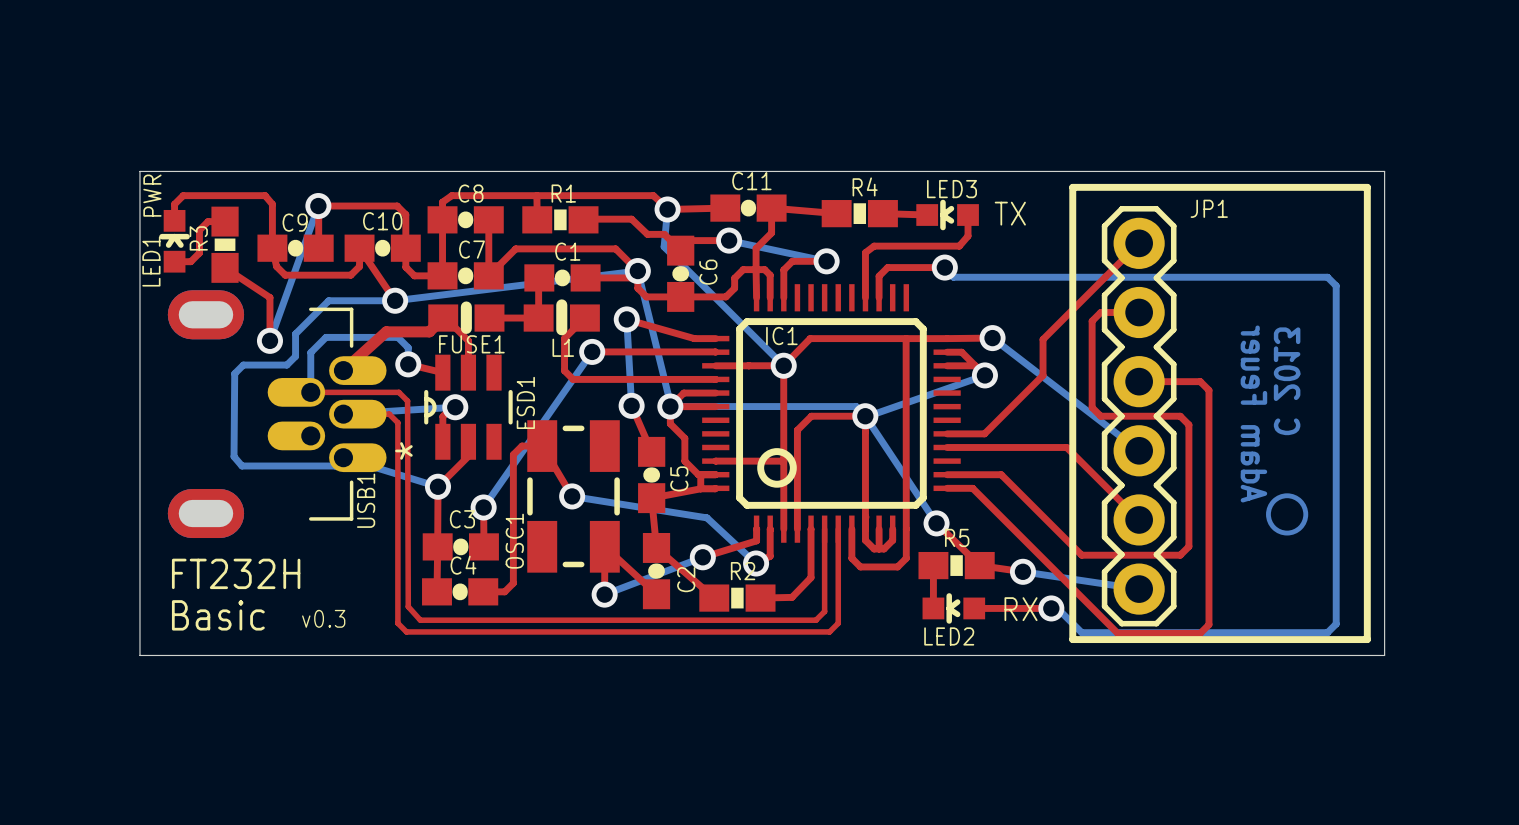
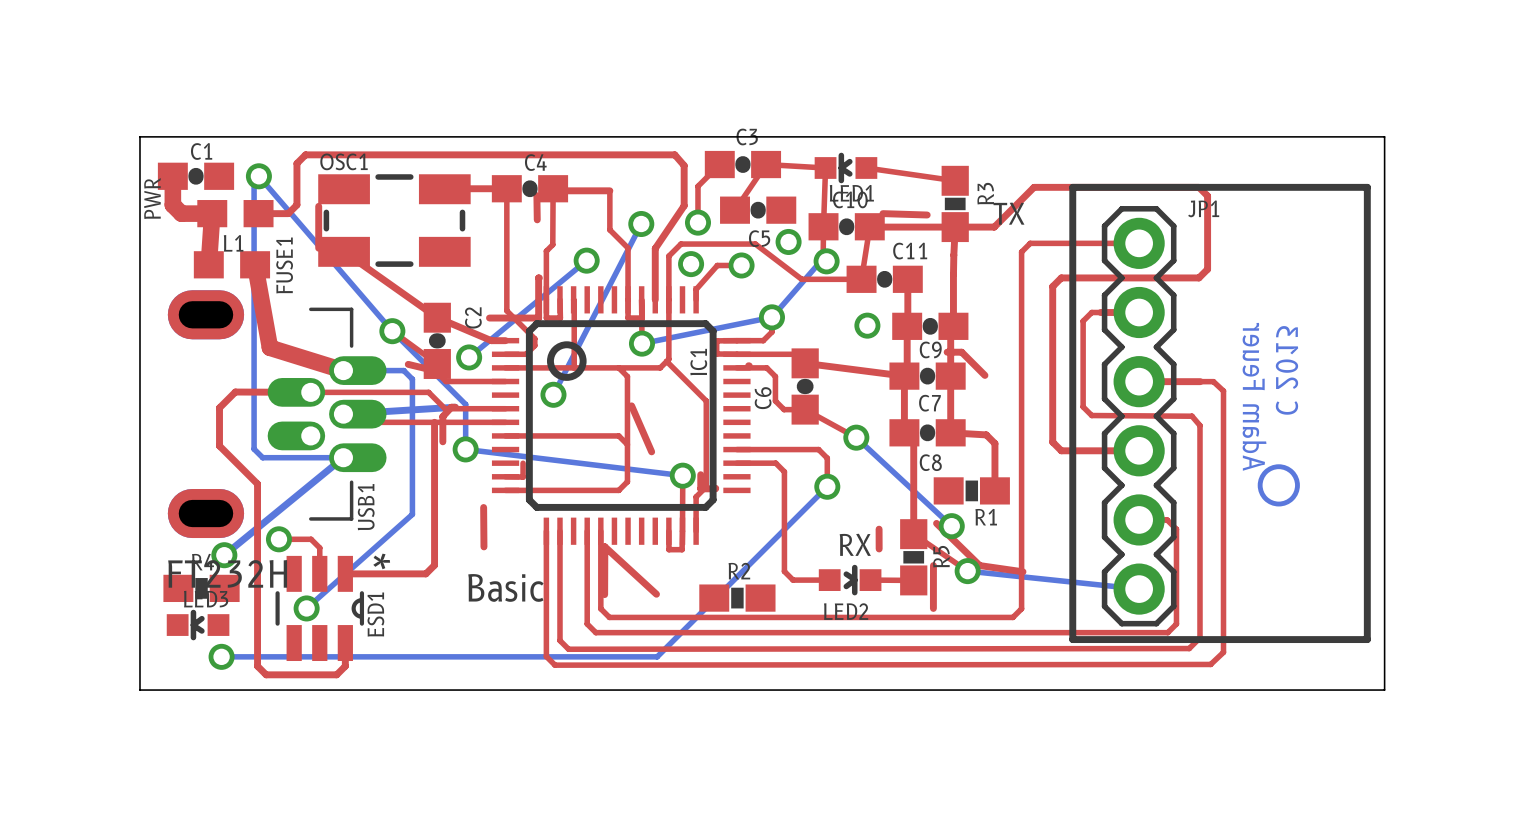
top track: none -> (719, 164) (697, 186) (697, 222)
top track: none -> (866, 167) (955, 180)
board edge: (139, 171) (1384, 171) -> (139, 171) (139, 136) (1384, 136) (1384, 171)
top track: none -> (172, 176) (172, 204) (181, 213) (212, 213) (208, 264)
C11 name position: C11 (751, 181) -> C11 (910, 251)
top track: none -> (444, 189) (506, 188) (506, 310) (534, 338) (534, 345) (526, 354) (505, 354)
C8 name position: C8 (470, 193) -> C8 (930, 462)
R1 name position: R1 (563, 193) -> R1 (986, 517)
top track: (318, 206) (397, 206) (405, 214) (405, 267) (414, 275) (442, 275) (442, 202) (451, 195) (653, 195) (667, 209) (725, 208) -> none
bottom track: (318, 206) (269, 340) -> none
via position: (318, 206) -> (258, 176)
C11 position: (748, 208) -> (884, 279)
bottom track: (667, 209) (664, 246) (783, 365) -> none
via: (667, 209) -> none
top track: none -> (735, 210) (766, 164) (825, 167) (823, 258)
top track: (836, 213) (771, 208) (771, 233) (756, 248) (756, 297) -> none
R4 position: (859, 213) -> (201, 588)
top track: none -> (259, 214) (288, 213) (296, 204) (296, 163) (305, 154) (674, 154) (684, 165) (684, 205) (655, 248) (655, 299)
LED3 position: (947, 215) -> (198, 625)
top track: (968, 215) (968, 236) (959, 246) (874, 246) (865, 252) (865, 297) -> none
C8 position: (465, 219) -> (927, 432)
top track: (488, 219) (488, 275) (515, 248) (615, 248) (637, 271) -> none
R1 position: (560, 219) -> (971, 490)
top track: (583, 219) (631, 219) (647, 234) (664, 234) (680, 250) (689, 240) (729, 240) -> none
top track: (174, 220) (174, 204) (183, 195) (265, 195) (272, 204) (272, 248) (276, 266) (285, 275) (350, 275) (359, 266) (359, 248) (395, 300) -> none
top track: (225, 221) (208, 221) (199, 230) (199, 253) (190, 261) (174, 261) -> none
C9 name position: C9 (295, 222) -> C9 (930, 349)
via: none -> (697, 222)
bottom track: none -> (641, 224) (553, 394)
via: none -> (641, 224)
top track: none -> (869, 226) (861, 279) (801, 279) (755, 244) (680, 244) (668, 256) (668, 359) (660, 367) (505, 367)
top track: none -> (870, 227) (994, 227) (1034, 187) (1198, 187) (1207, 195) (1207, 269) (1198, 277) (1061, 277) (1052, 286) (1052, 442) (1061, 450) (1139, 450)
top track: none -> (955, 227) (953, 326) (950, 338) (950, 432) (986, 434) (994, 443) (994, 490)
R3 name position: R3 (198, 238) -> R3 (985, 193)
bottom track: (729, 240) (826, 261) -> none
via: (729, 240) -> none
LED1 rotation: 0° (174, 241) -> 90° counterclockwise (845, 167)
LED1 position: (174, 241) -> (845, 167)
via: none -> (788, 241)
top track: (1139, 243) (1043, 339) (1043, 375) (984, 433) (947, 433) -> (1139, 243) (1030, 243) (1021, 252) (1021, 608) (1012, 617) (609, 617) (600, 608) (600, 531)
R3 position: (225, 244) -> (955, 203)
C9 position: (295, 248) -> (930, 326)
C10 position: (382, 248) -> (846, 226)
C7 name position: C7 (472, 249) -> C7 (929, 403)
top track: none -> (344, 251) (437, 317) (491, 340) (505, 340)
C1 name position: C1 (567, 251) -> C1 (201, 151)
bottom track: none -> (823, 258) (771, 317) (641, 343)
bottom track: none -> (586, 260) (469, 357)
via: none -> (586, 260)
top track: (826, 261) (792, 261) (783, 269) (783, 297) -> none
via: none -> (691, 264)
top track: none -> (741, 265) (717, 265) (696, 289) (696, 299)
via: none -> (741, 265)
top track: (225, 267) (269, 297) (269, 340) -> none
top track: (944, 267) (887, 267) (879, 276) (879, 297) -> none
bottom track: (944, 267) (953, 277) (1327, 277) (1336, 285) (1336, 624) (1327, 632) (1081, 632) (1057, 608) (1051, 608) -> none
via: (944, 267) -> none
top track: (637, 271) (637, 288) (646, 296) (726, 296) (734, 288) (734, 278) (743, 269) (764, 269) (770, 275) (770, 297) -> none
top track: (637, 271) (630, 277) (585, 277) -> none
via: (637, 271) -> none
C6 name position: C6 (708, 272) -> C6 (763, 398)
C6 position: (680, 273) -> (805, 386)
C7 position: (465, 275) -> (927, 376)
C1 position: (562, 277) -> (195, 176)
top track: none -> (907, 279) (907, 373) (904, 376)
top track: none -> (559, 299) (560, 318) (546, 318) (546, 251) (552, 244) (553, 188) (555, 190) (609, 190) (609, 229) (628, 248) (628, 318) (641, 318) (641, 299) (641, 343)
top track: none -> (573, 299) (574, 367)
via: (395, 300) -> none
line: (561, 304) (561, 329) -> none
line: (466, 306) (466, 328) -> none
top track: (1100, 312) (1092, 321) (1092, 407) (1100, 416) (1180, 416) (1188, 424) (1188, 546) (1180, 555) (1081, 555) (1001, 474) (947, 474) -> (1100, 312) (1091, 312) (1083, 321) (1083, 406) (1091, 415) (1192, 416) (1199, 425) (1199, 637) (1189, 648) (568, 649) (559, 640) (559, 531)
top track: none -> (771, 317) (771, 332) (763, 340) (716, 340) (716, 353) (796, 354) (805, 362)
via: none -> (771, 317)
FUSE1 position: (466, 318) -> (231, 264)
L1 position: (561, 318) -> (235, 213)
top track: (584, 318) (564, 338) (564, 370) (573, 379) (715, 379) -> none
top track: (626, 319) (694, 338) (715, 338) -> none
bottom track: (626, 319) (631, 405) -> none
via: (626, 319) -> none
via: none -> (867, 325)
top track: none -> (392, 331) (437, 363) (437, 372) (445, 381) (505, 381)
via: none -> (392, 331)
top track: (906, 338) (906, 558) (897, 566) (860, 566) (851, 558) (851, 529) -> none
top track: (992, 338) (810, 338) (783, 365) -> none
bottom track: (992, 338) (1139, 450) -> none
via: (992, 338) -> none
via: (269, 340) -> none
via: none -> (641, 343)
FUSE1 name rotation: 0° (471, 344) -> 90° counterclockwise (284, 265)
top track: (592, 351) (715, 351) -> none
bottom track: (592, 351) (483, 507) -> none
via: (592, 351) -> none
via: none -> (469, 357)
top track: none -> (666, 361) (706, 401) (706, 486) (696, 496) (696, 531)
top track: none -> (805, 363) (904, 376)
bottom track: (408, 364) (408, 347) (397, 337) (325, 337) (310, 352) (310, 392) -> none
via: (408, 364) -> none
top track: (783, 365) (783, 529) -> none
via: (783, 365) -> none
top track: (947, 365) (975, 365) -> none
top track: none -> (618, 367) (627, 376) (627, 481) (618, 490) (505, 490)
top track: none -> (736, 367) (766, 367) (775, 376) (775, 400) (784, 409) (805, 409) (856, 437)
top track: (343, 370) (386, 331) (429, 331) (443, 318) (445, 318) (468, 340) (468, 372) -> (343, 370) (269, 347) (255, 264)
bottom track: none -> (343, 370) (403, 370) (412, 379) (412, 514) (306, 608)
via: (984, 375) -> none
top track: none -> (904, 376) (904, 432) (913, 441) (913, 534) (967, 571)
bottom track: (984, 377) (984, 375) (865, 416) -> none
top track: (1200, 381) (1208, 390) (1208, 624) (1200, 633) (1117, 633) (972, 488) (947, 488) -> (1200, 381) (1213, 381) (1223, 390) (1223, 652) (1210, 664) (555, 665) (546, 656) (546, 531)
top track: none -> (310, 392) (235, 392) (219, 407) (219, 445) (257, 483) (257, 666) (266, 674) (336, 674) (345, 666) (345, 643)
top track: (398, 392) (407, 401) (408, 606) (420, 620) (815, 620) (824, 611) (824, 529) -> (398, 392) (428, 392) (445, 408) (505, 408)
top track: (715, 393) (683, 393) (670, 406) -> none
via: none -> (553, 394)
via: (631, 405) -> none
top track: (670, 406) (715, 406) -> none
top track: (670, 406) (670, 423) (684, 438) (684, 461) (698, 474) (715, 474) -> none
via: (670, 406) -> none
via: (455, 407) -> none
ESD1 rotation: 0° (468, 407) -> 180° (319, 608)
ESD1 position: (468, 407) -> (319, 608)
IC1 rotation: 0° (831, 413) -> 90° clockwise (621, 415)
IC1 position: (831, 413) -> (621, 415)
top track: (343, 414) (389, 414) (397, 422) (397, 623) (406, 631) (829, 631) (838, 623) (838, 529) -> (343, 414) (351, 422) (505, 422)
bottom track: (865, 416) (856, 406) (670, 406) (637, 271) (395, 300) (328, 300) (295, 333) (295, 356) (286, 365) (243, 365) (234, 373) (234, 456) (241, 466) (335, 466) (343, 457) (438, 486) -> none
bottom track: (865, 416) (936, 523) -> none
via position: (865, 416) -> (856, 437)
top track: none -> (434, 422) (434, 565) (425, 573) (345, 573)
top track: none -> (505, 435) (618, 435) (627, 444)
bottom track: none -> (856, 437) (951, 526)
top track: (468, 441) (468, 456) (438, 486) (436, 591) -> none
top track: (947, 447) (1066, 447) (1139, 519) -> (587, 531) (587, 624) (595, 632) (1167, 632) (1176, 624) (1176, 529) (1167, 519) (1139, 519)
via: none -> (465, 449)
top track: none -> (736, 449) (818, 449) (827, 458) (827, 486)
top track: (715, 461) (783, 461) -> none
top track: none -> (523, 463) (523, 477) (505, 476)
top track: none -> (736, 463) (775, 463) (784, 471) (784, 571) (793, 580) (829, 580)
C5 rotation: 0° (651, 475) -> 90° clockwise (758, 210)
C5 position: (651, 475) -> (758, 210)
top track: none -> (682, 475) (682, 549) (668, 549) (668, 531)
bottom track: none -> (682, 475) (465, 449) (465, 404) (392, 331) (258, 176) (254, 181) (254, 449) (262, 457) (343, 457) (224, 555)
via: none -> (682, 475)
via: (438, 486) -> none
bottom track: none -> (827, 486) (657, 656) (221, 656)
via: none -> (827, 486)
top track: (700, 488) (651, 498) (656, 547) (714, 598) -> none
top track: (572, 496) (542, 446) (522, 446) (513, 454) (513, 583) (504, 591) (483, 591) -> none
bottom track: (572, 496) (706, 517) (756, 563) -> none
via: (572, 496) -> none
OSC1 rotation: 0° (573, 496) -> 90° clockwise (394, 220)
OSC1 position: (573, 496) -> (394, 220)
via: (483, 507) -> none
drawing position: (1287, 514) -> (1278, 485)
via position: (936, 523) -> (951, 526)
top track: (756, 529) (756, 540) (702, 557) -> none
top track: (770, 529) (770, 556) (756, 563) -> none
top track: (797, 529) (797, 430) (811, 416) (865, 416) (865, 540) (874, 548) (884, 548) (892, 540) (892, 529) -> none
top track: (811, 529) (811, 577) (792, 597) (760, 598) -> none
top track: none -> (278, 539) (311, 539) (319, 547) (319, 573)
via: none -> (278, 539)
C3 position: (460, 546) -> (742, 164)
via: none -> (224, 555)
bottom track: (702, 557) (604, 594) -> none
via: (702, 557) -> none
via: (756, 563) -> none
R5 rotation: 0° (956, 565) -> 90° clockwise (913, 557)
C2 position: (656, 571) -> (437, 340)
via: none -> (967, 571)
bottom track: (1022, 571) (1139, 589) -> (967, 571) (1139, 589)
via: (1022, 571) -> none
C2 name position: C2 (686, 579) -> C2 (473, 317)
top track: none -> (870, 580) (913, 580)
C4 position: (460, 591) -> (529, 188)
via: (604, 594) -> none
via: none -> (306, 608)
LED2 rotation: 0° (953, 608) -> 180° (850, 580)
LED2 position: (953, 608) -> (850, 580)
top track: (974, 608) (1051, 608) -> none
via: (1051, 608) -> none
text position: RX (1021, 609) -> RX (855, 544)
text position: Basic (218, 615) -> Basic (505, 587)
text: v0.3 (323, 618) -> none
board edge: (139, 655) (1384, 655) -> (139, 655) (139, 690) (1384, 690) (1384, 655)
via: none -> (221, 656)

